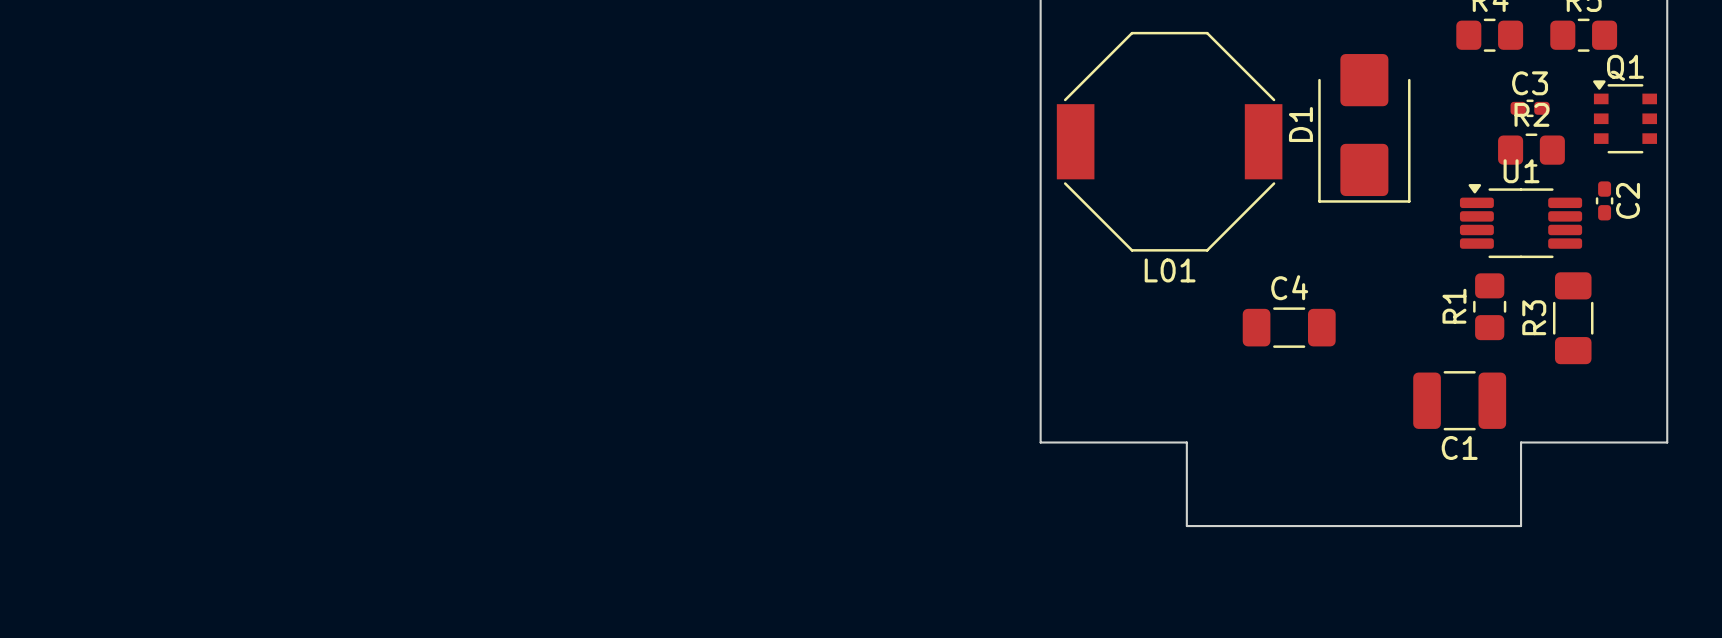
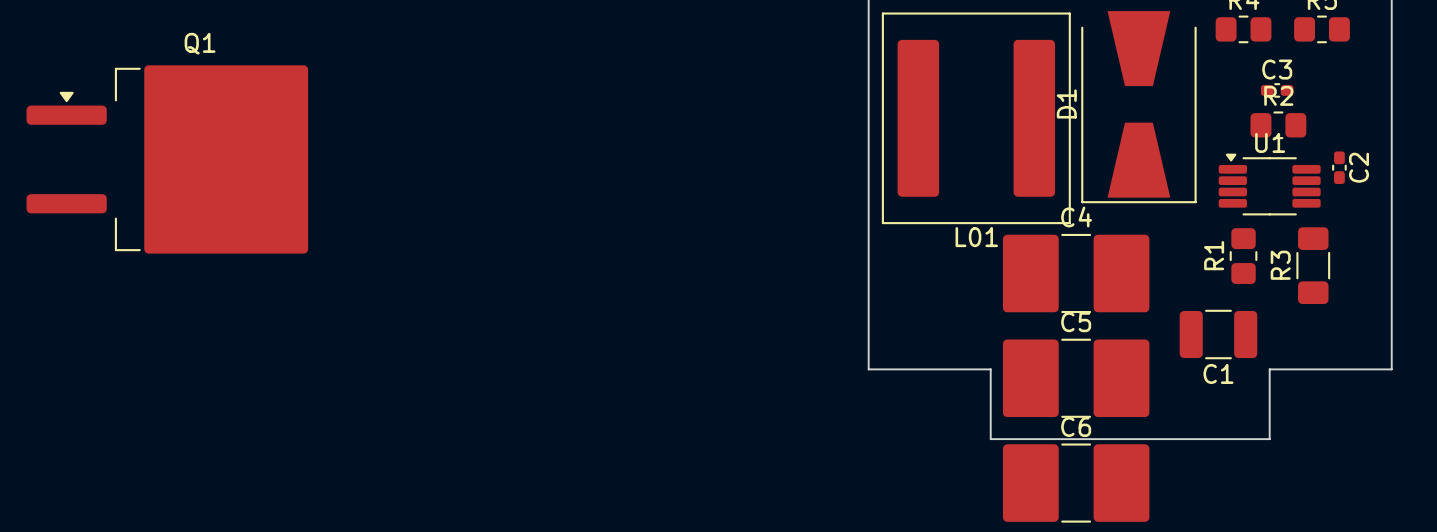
L01 footprint: [1056, 31, 1283, 252] -> [881, 12, 1071, 225]
D1 footprint: [1318, 54, 1411, 203] -> [1081, 11, 1197, 204]
Q1 name position: Q1 (1625, 67) -> Q1 (200, 43)
Q1 footprint: [1593, 80, 1658, 154] -> [26, 65, 309, 254]
C4 footprint: [1242, 307, 1336, 348] -> [1002, 233, 1150, 314]
C5: none -> (1076, 378)
C6: none -> (1076, 483)

